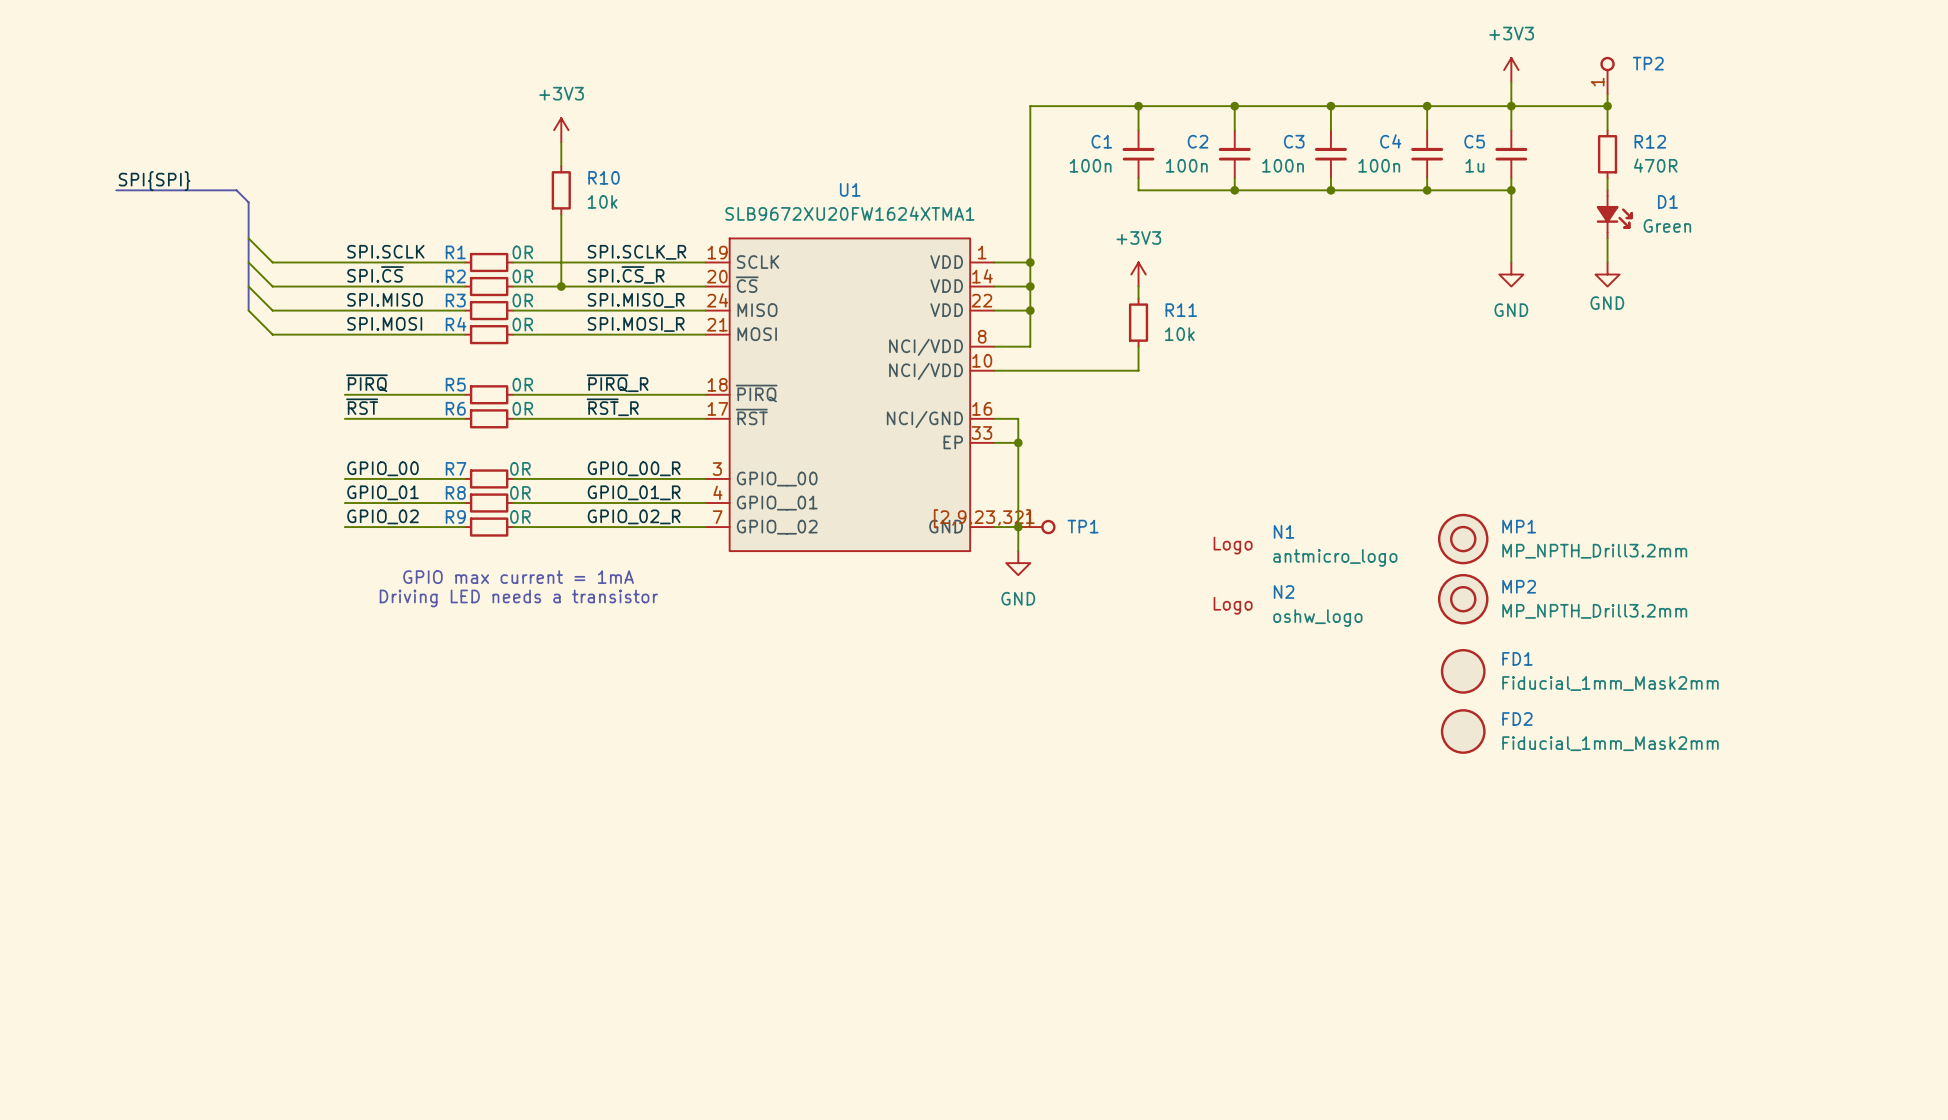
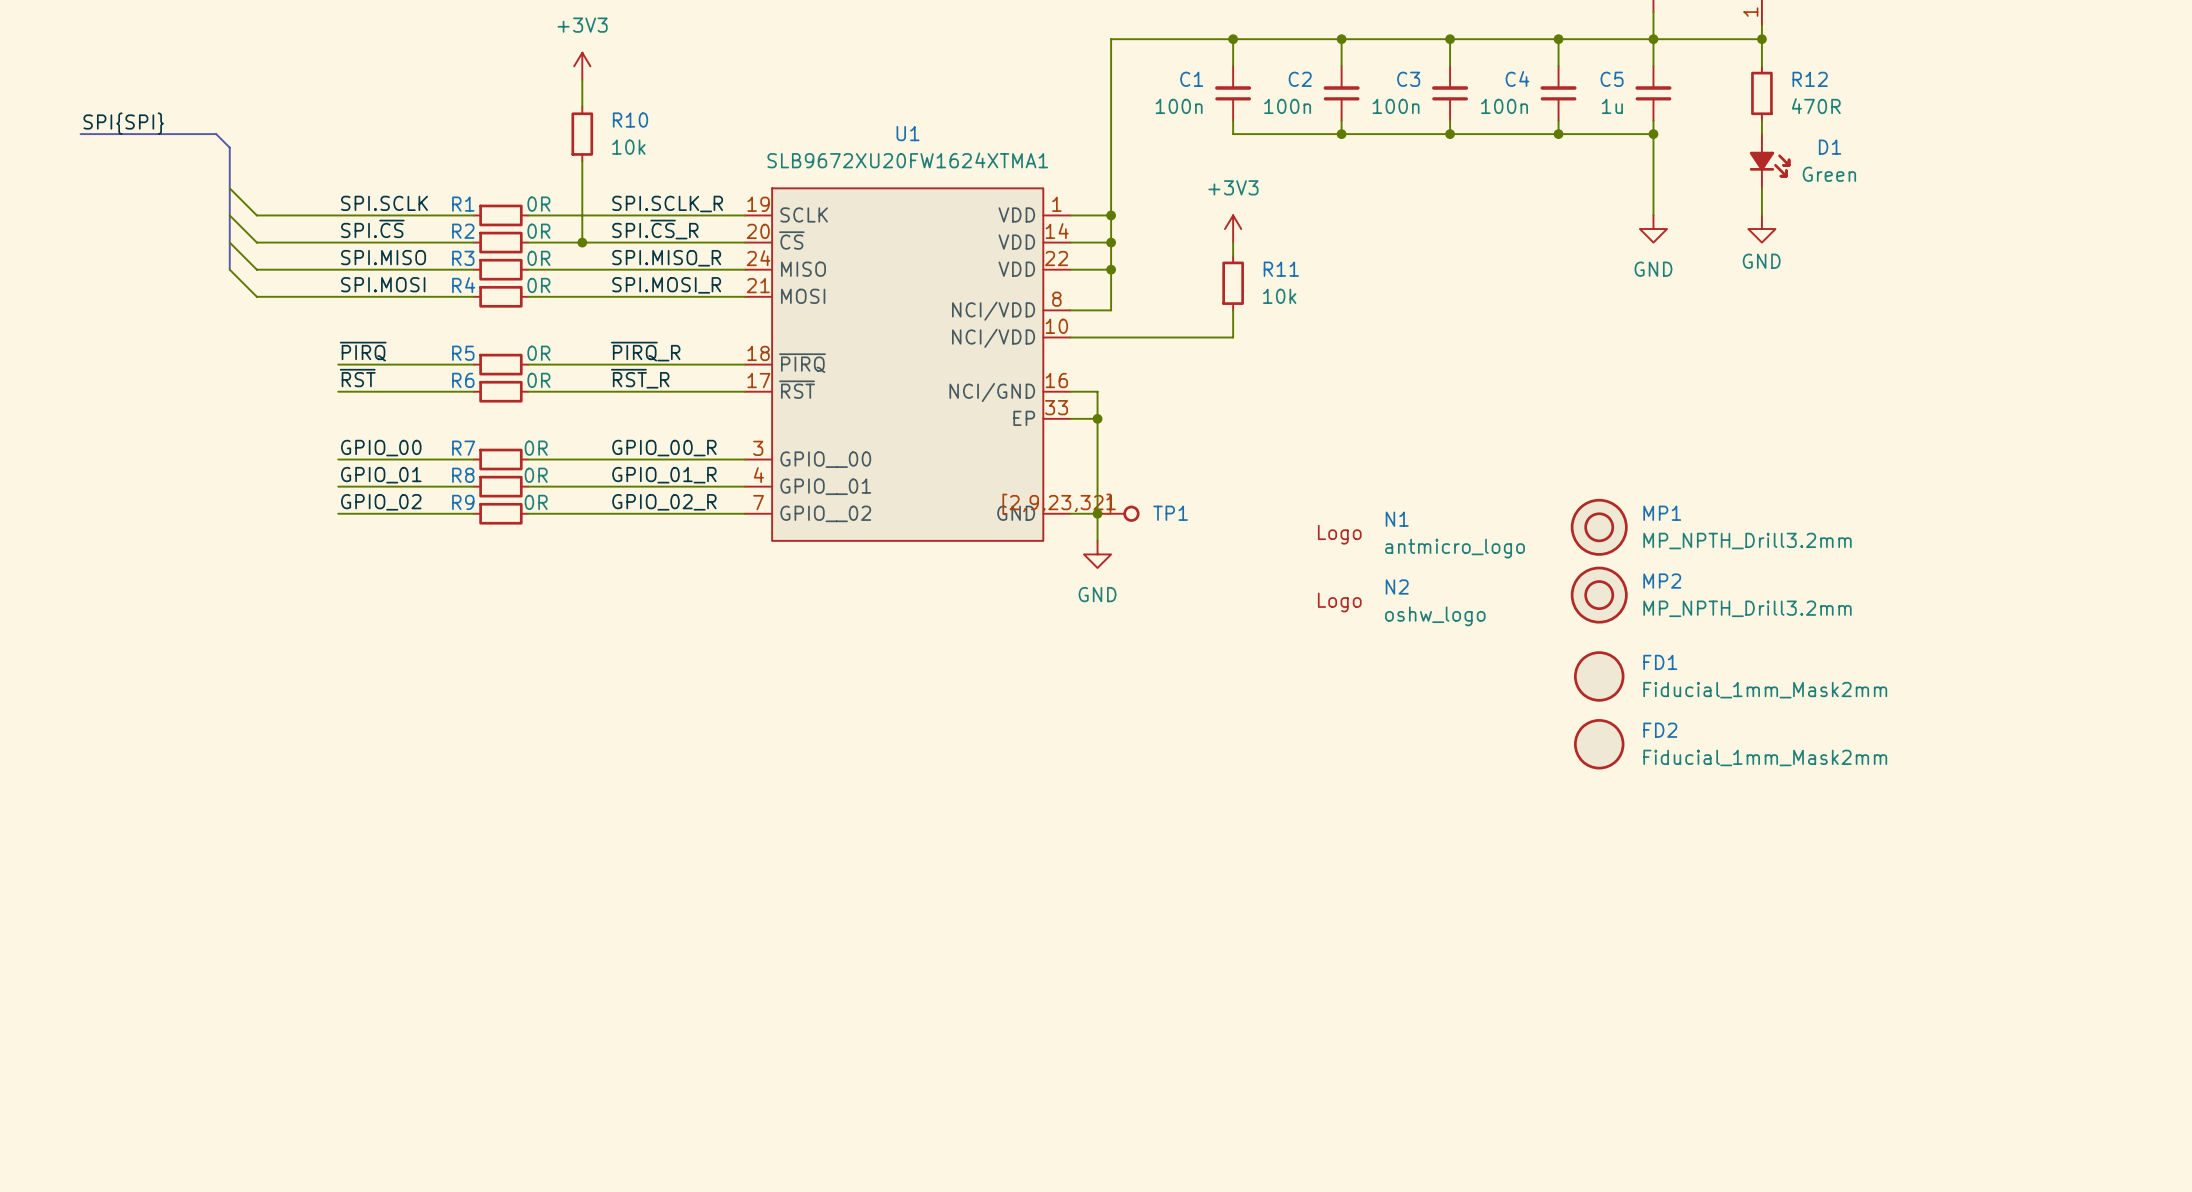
text: GPIO max current = 1mA (518, 577) -> none
text: Driving LED needs a transistor (518, 598) -> none

